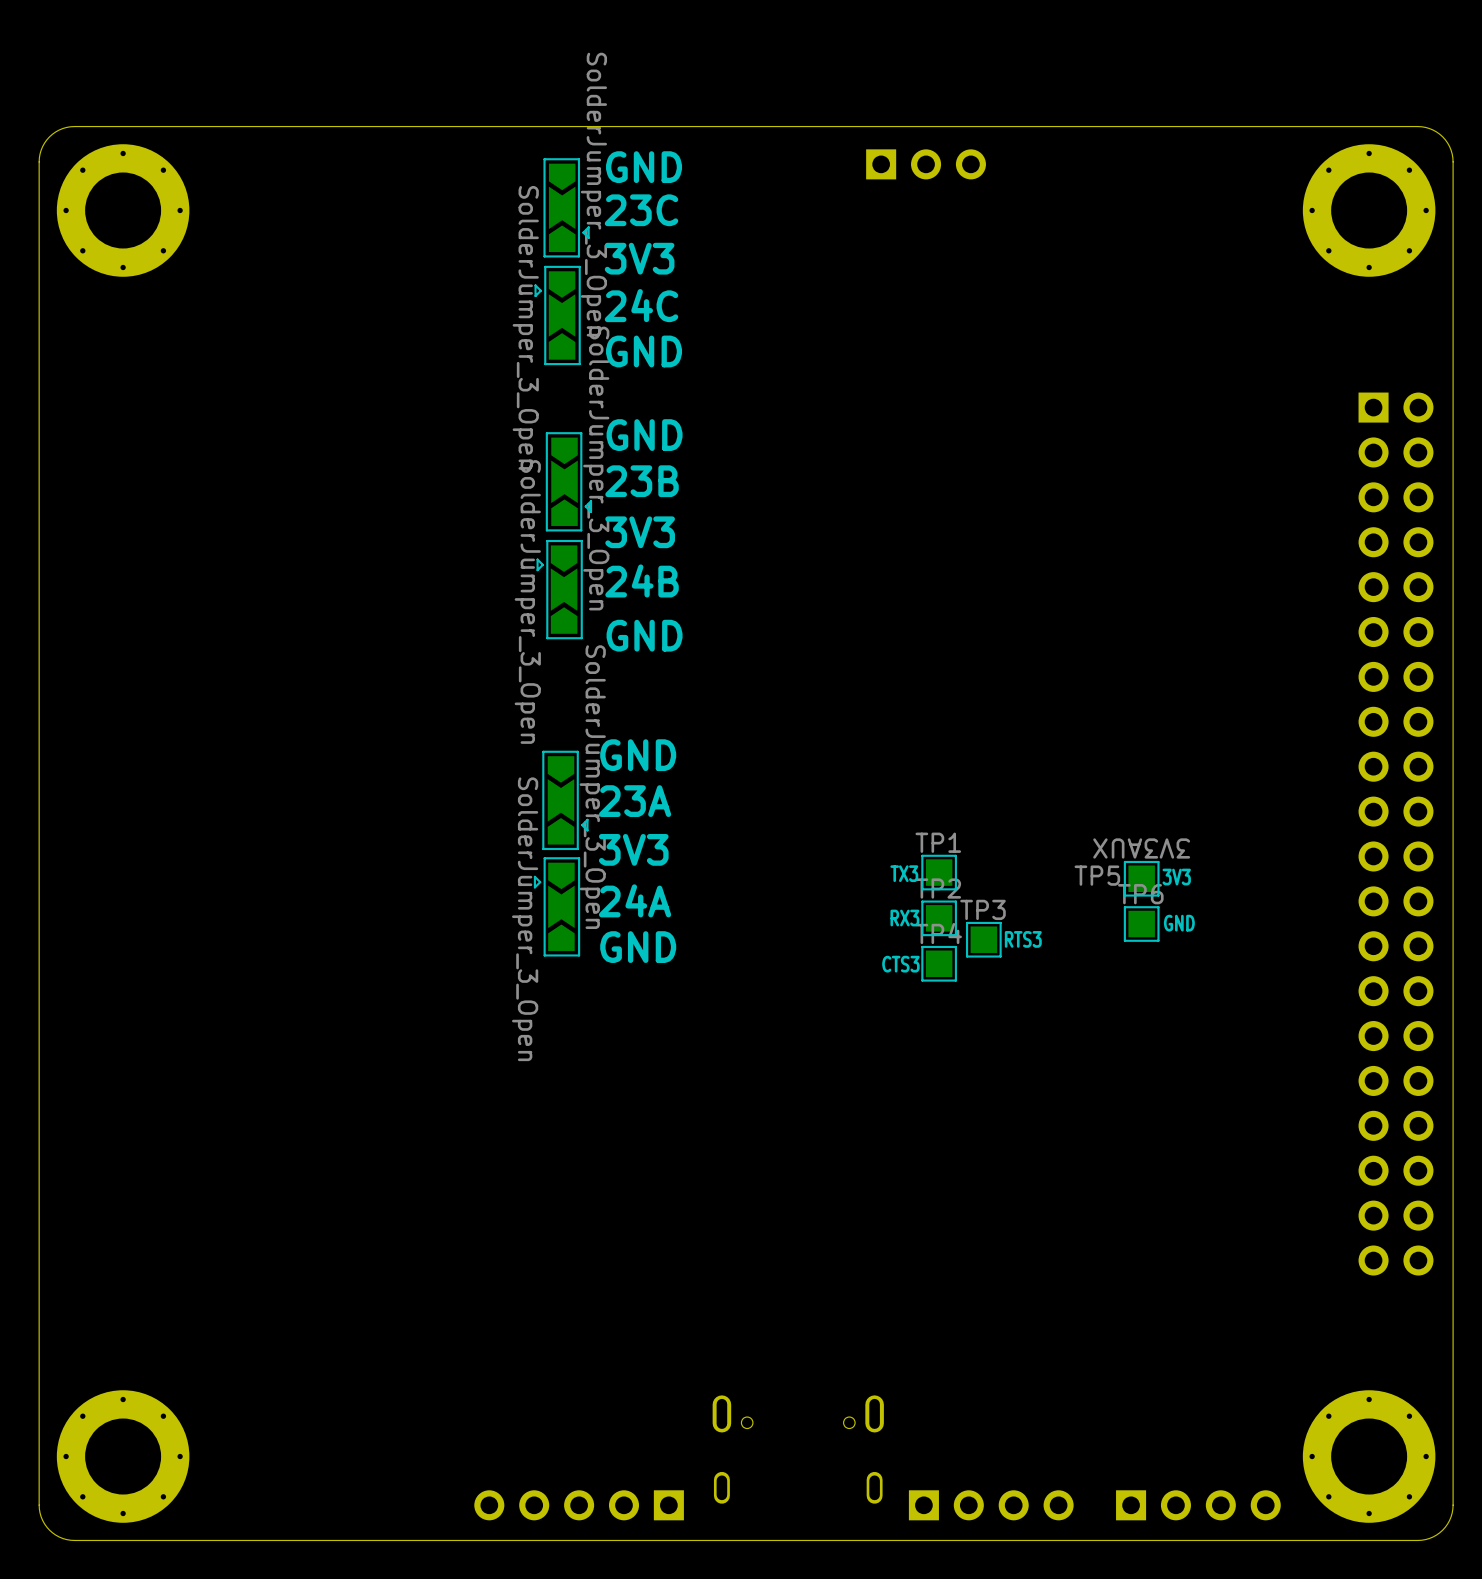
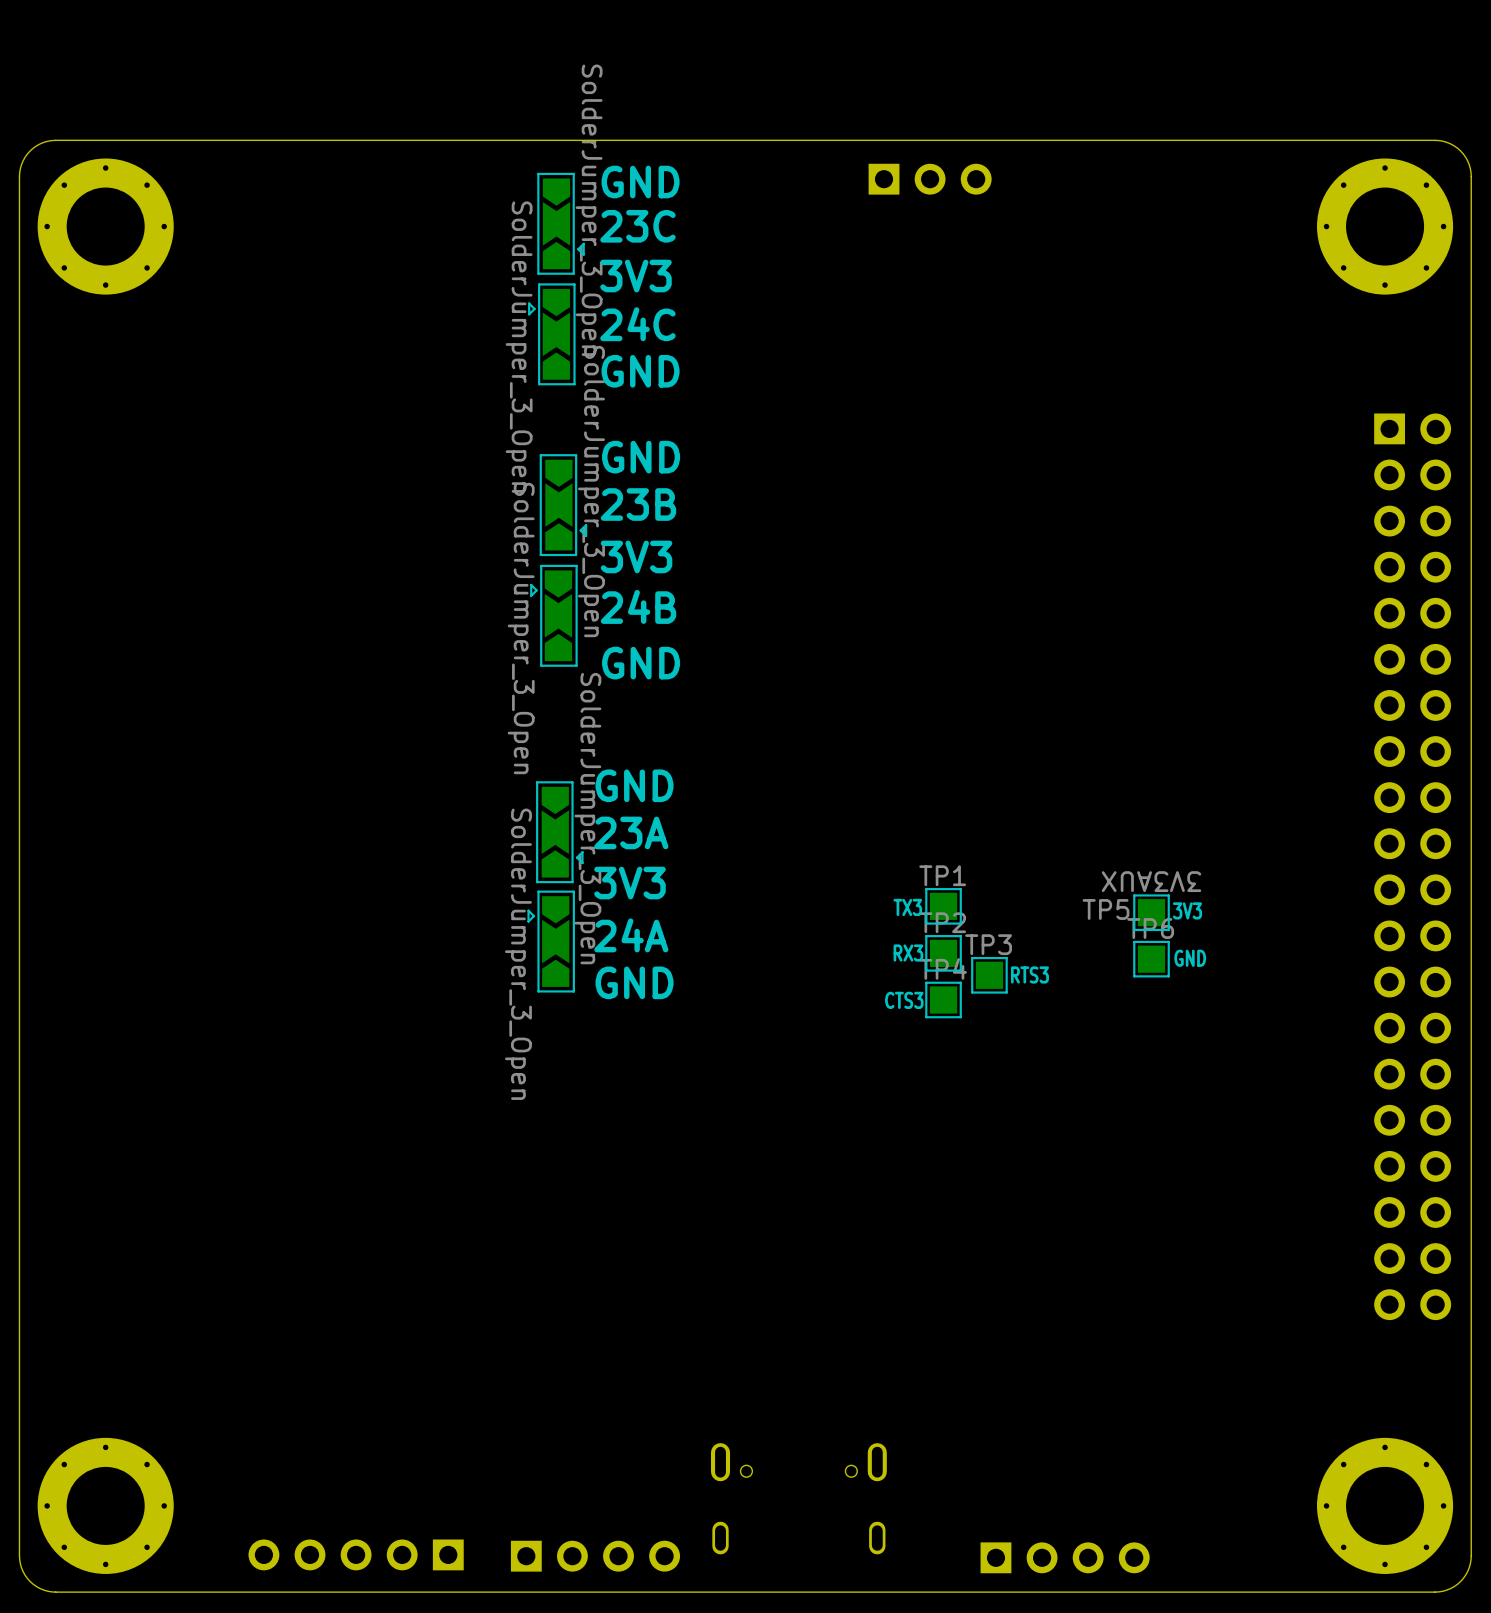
part position: (579, 1505) -> (356, 1554)
part: none -> (595, 1556)
part position: (991, 1505) -> (1065, 1557)
part: (1198, 1505) -> none

